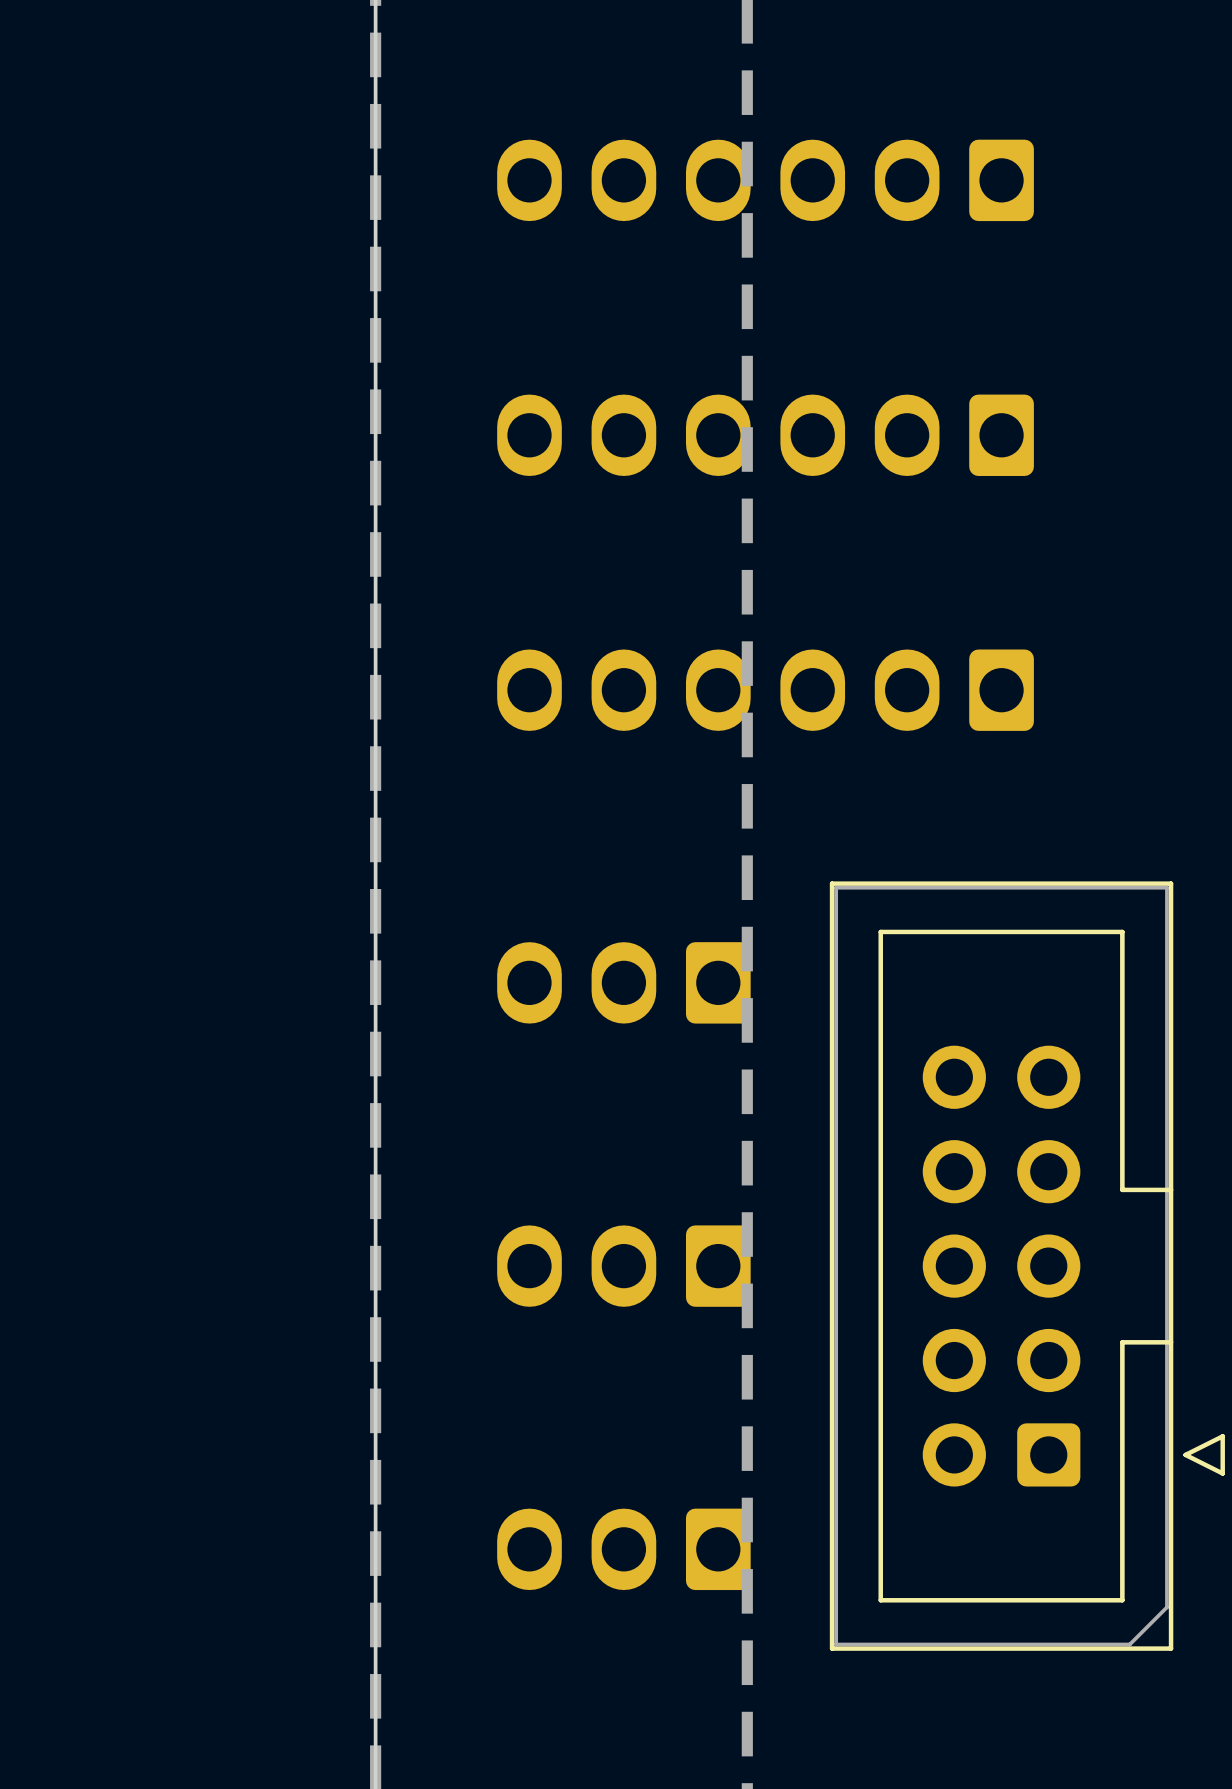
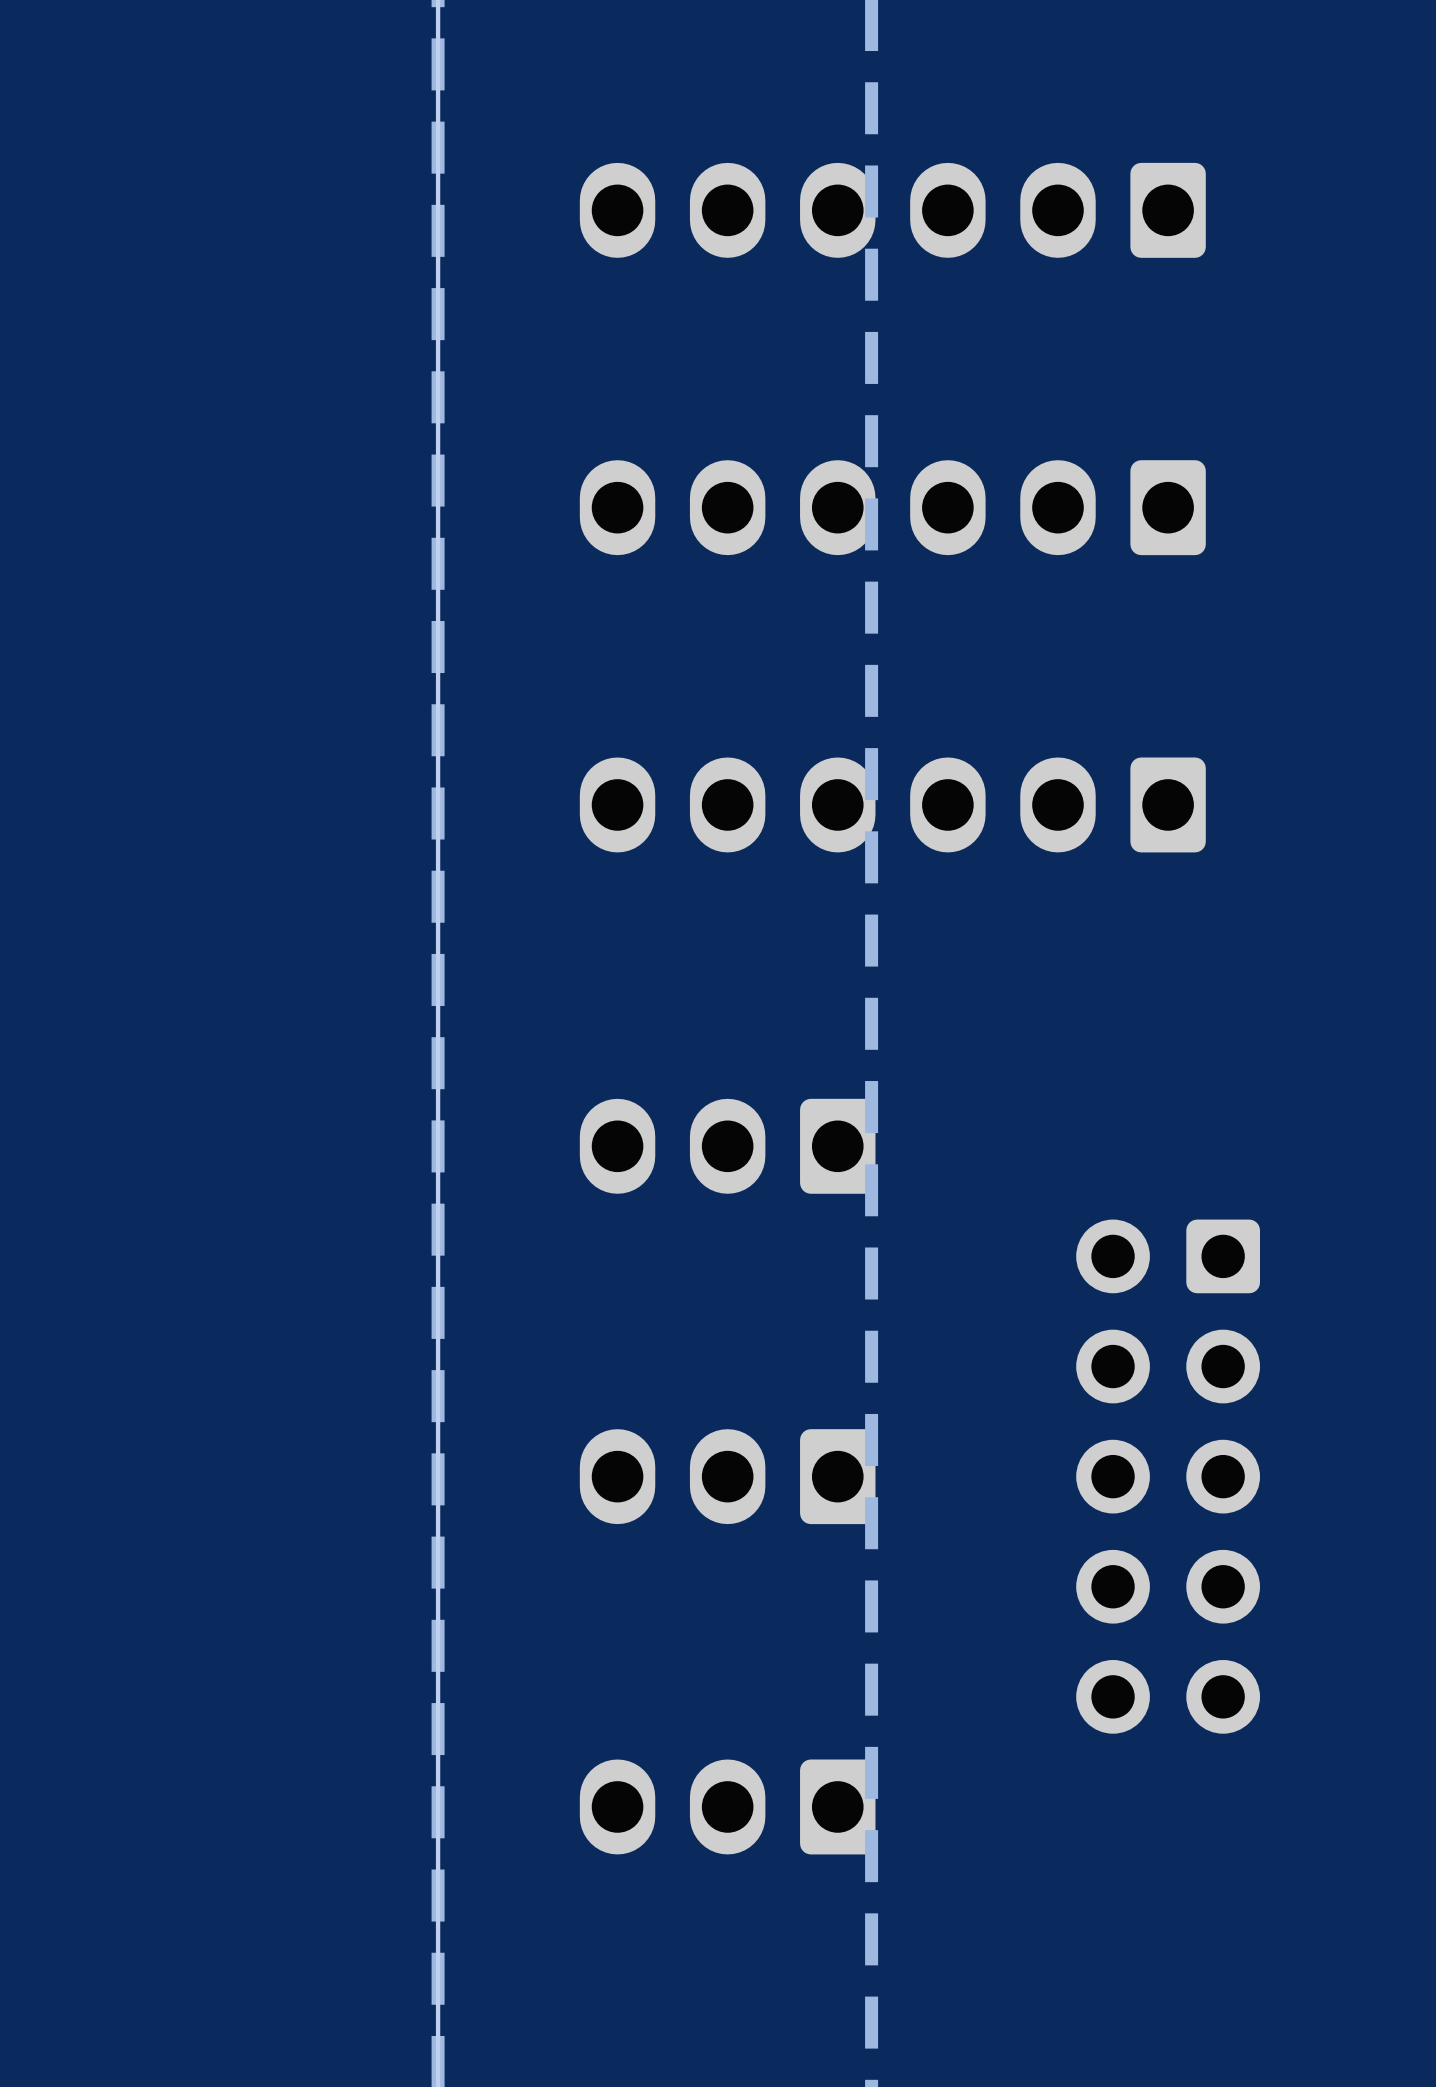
part side: top (1027, 1266) -> bottom (1168, 1476)

